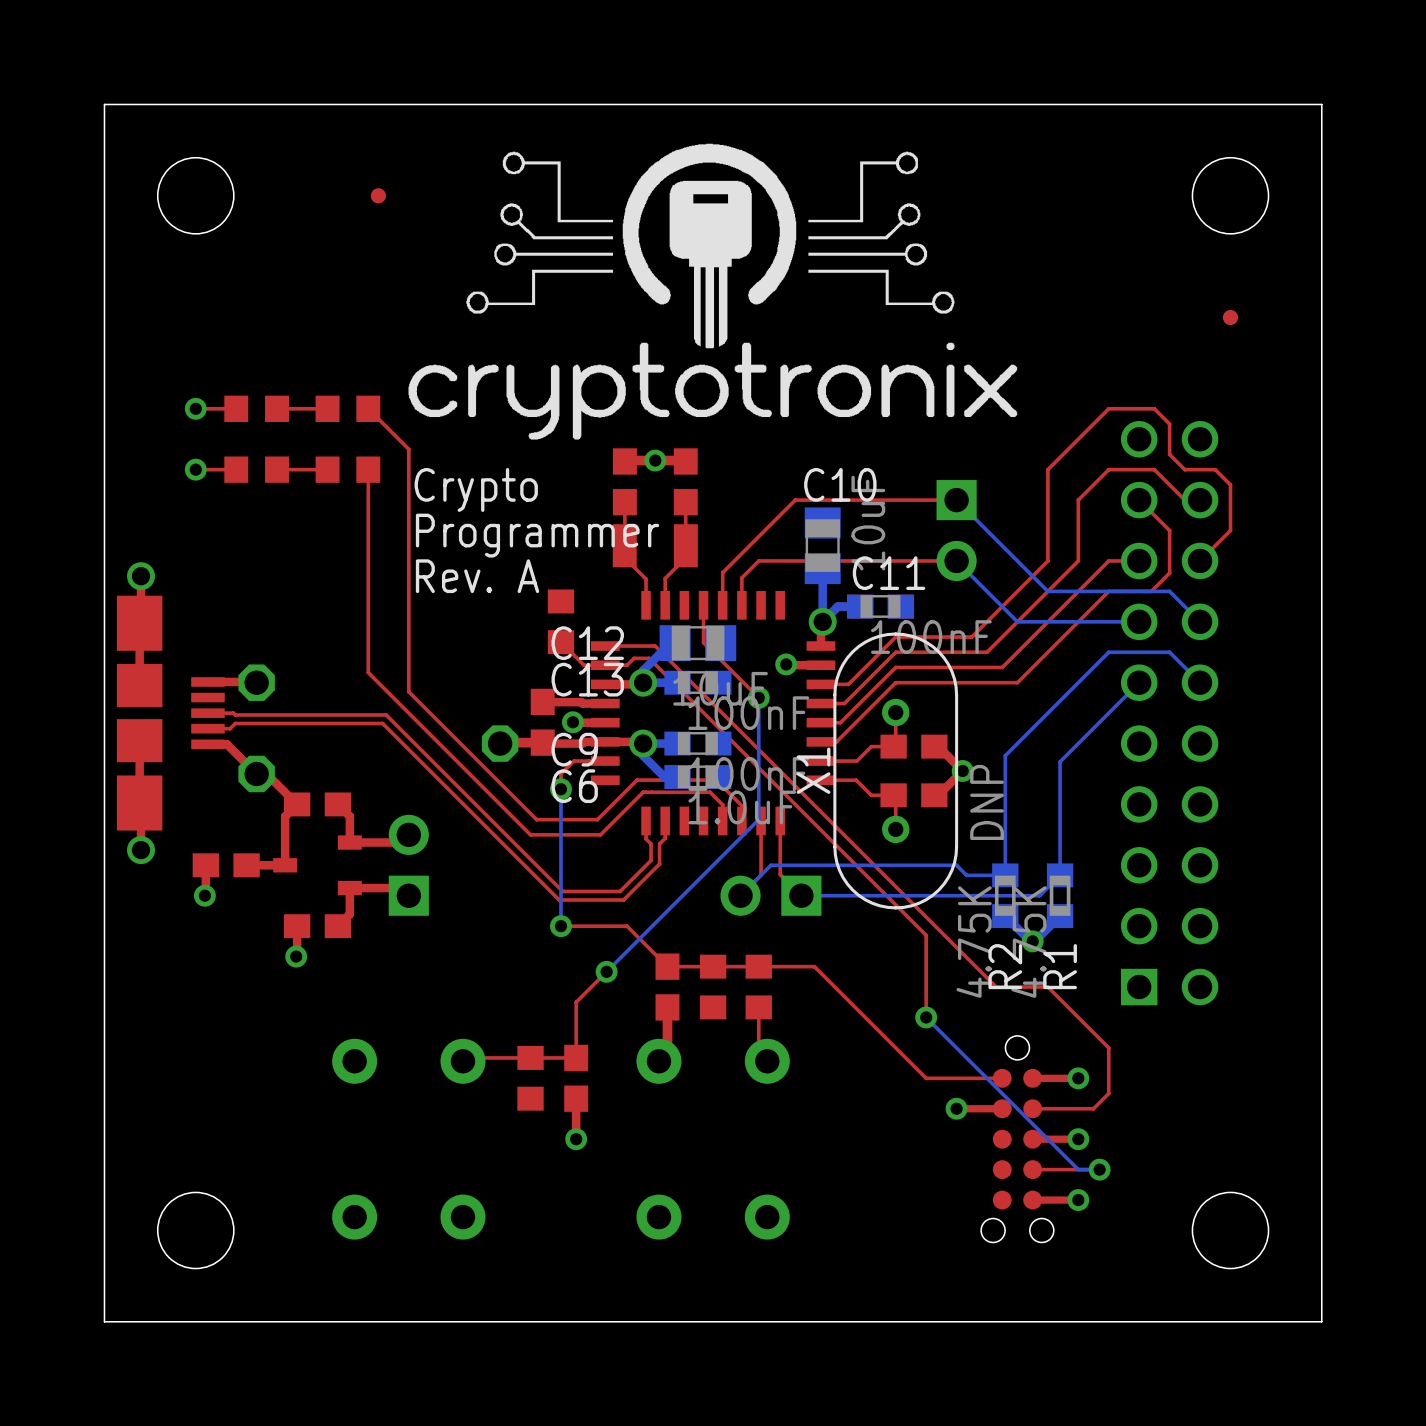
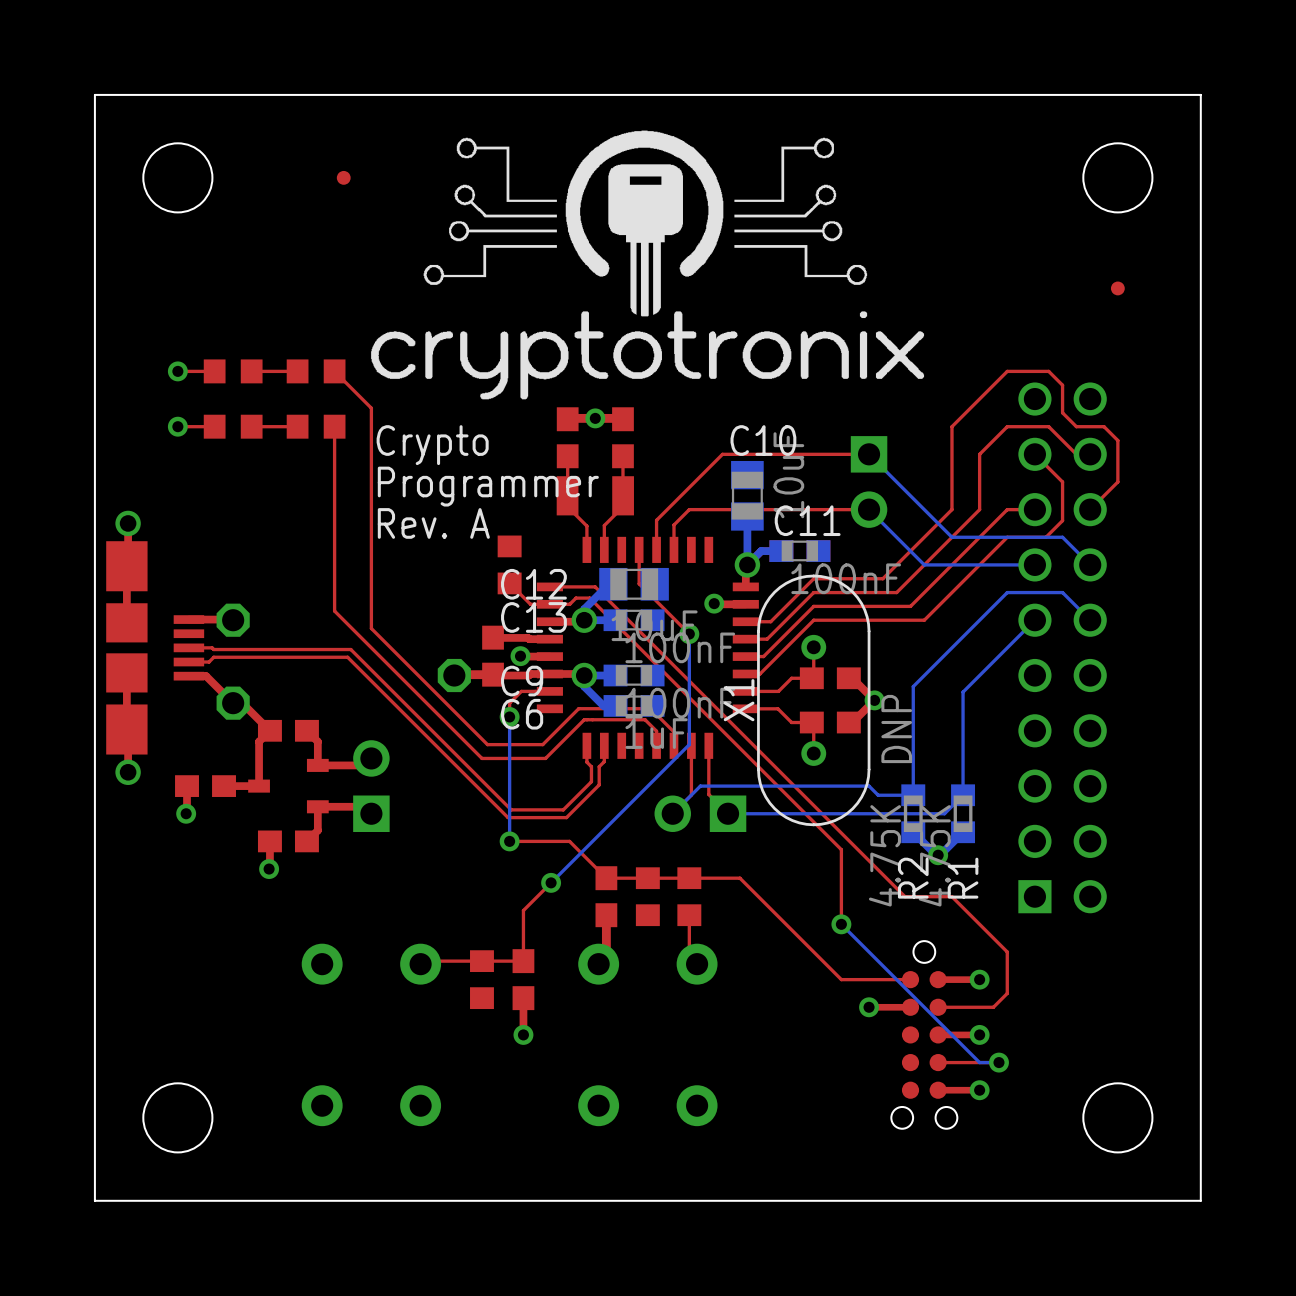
C6 value: 1.0uF (742, 807) -> 1uF (656, 733)

